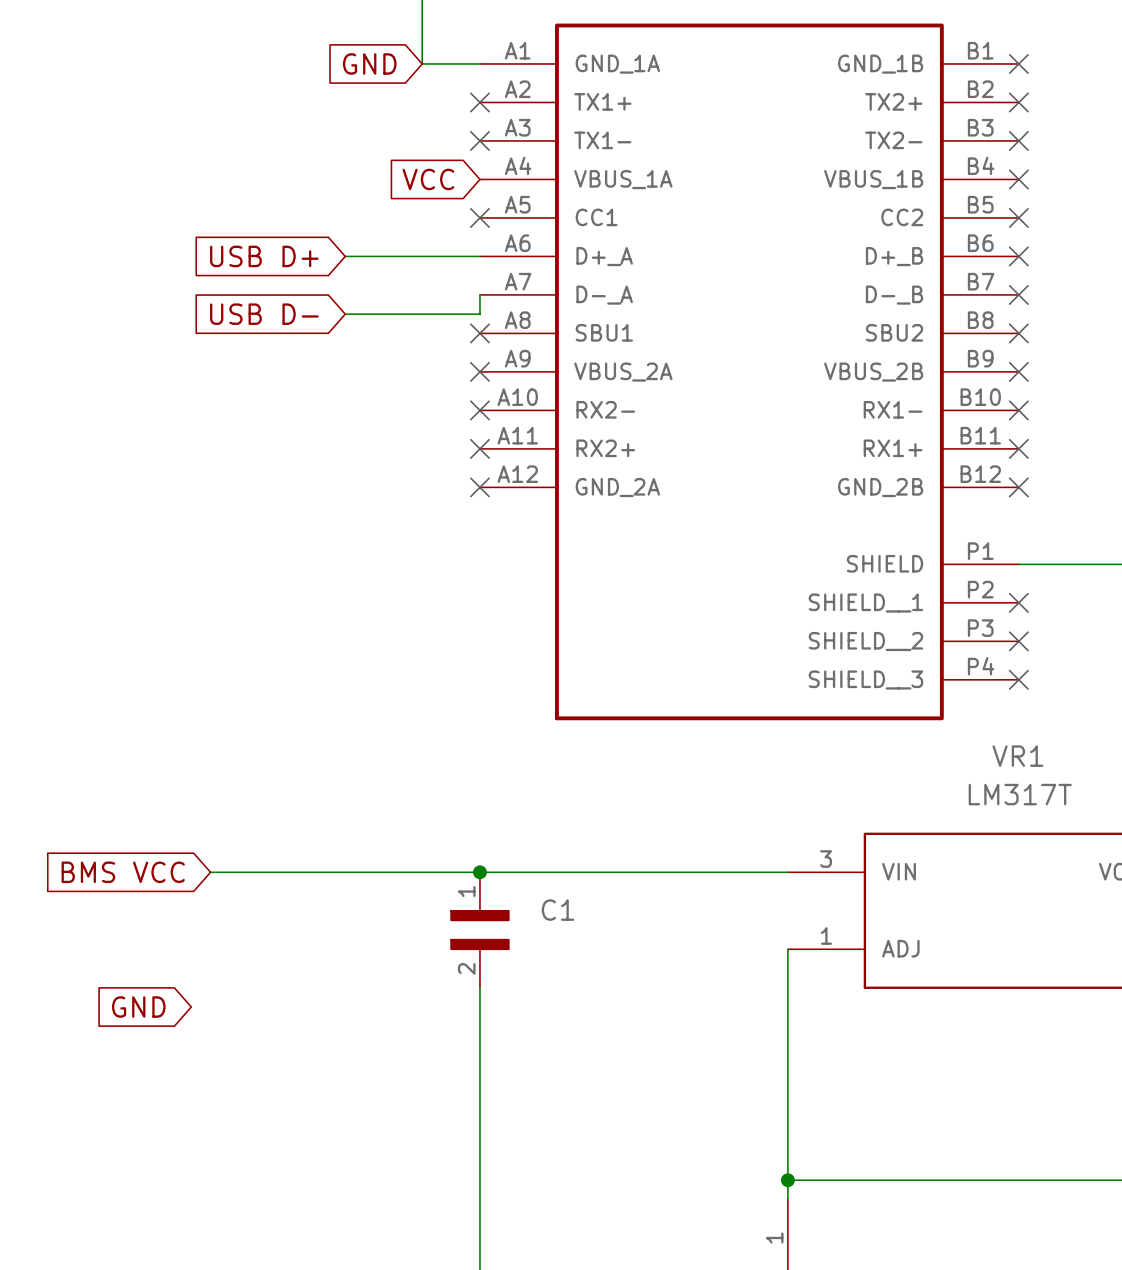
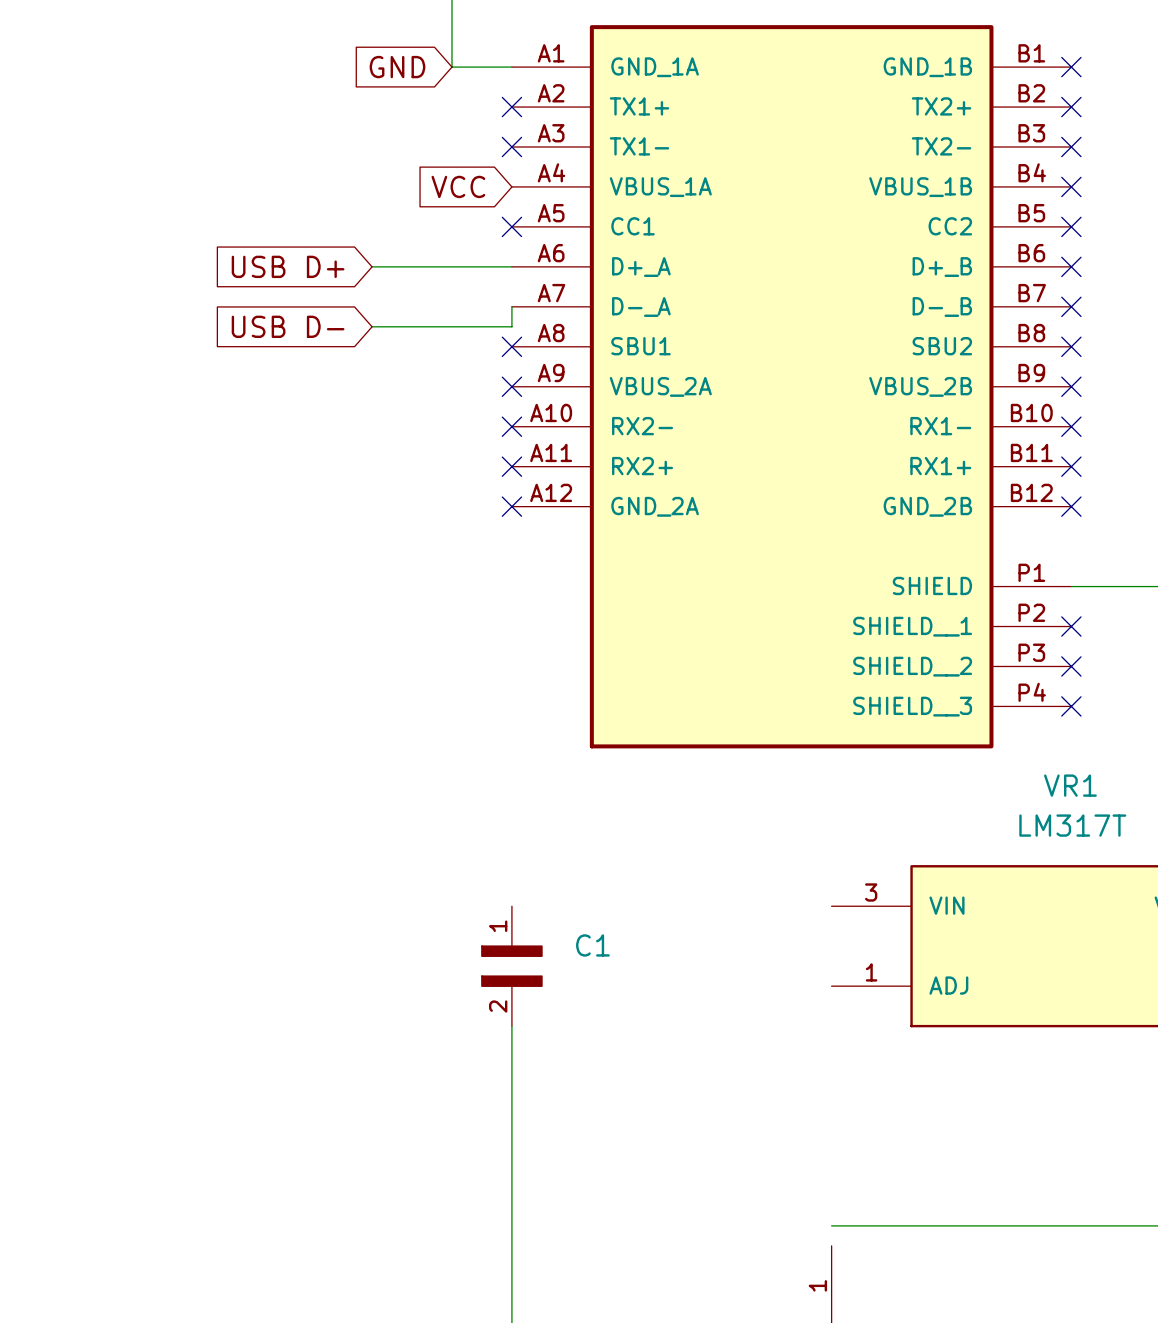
global label: BMS VCC (123, 872) -> none
wire: (210, 872) (787, 872) -> none
junction: (479, 872) -> none
wire: (787, 949) (787, 1199) -> none
global label: GND (138, 1007) -> none
junction: (787, 1180) -> none

